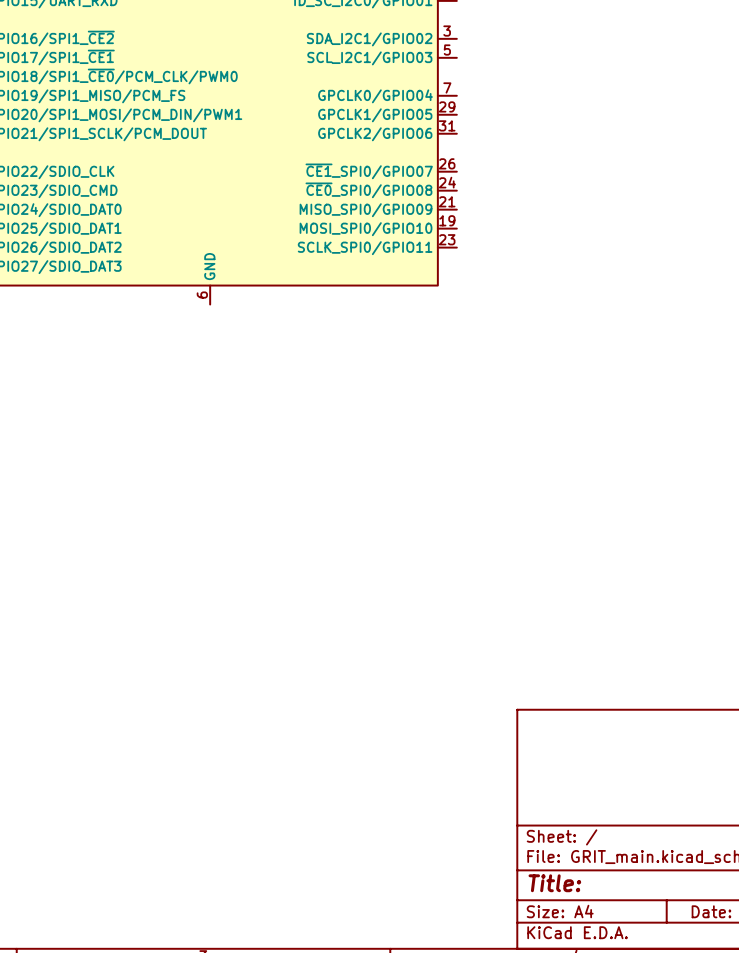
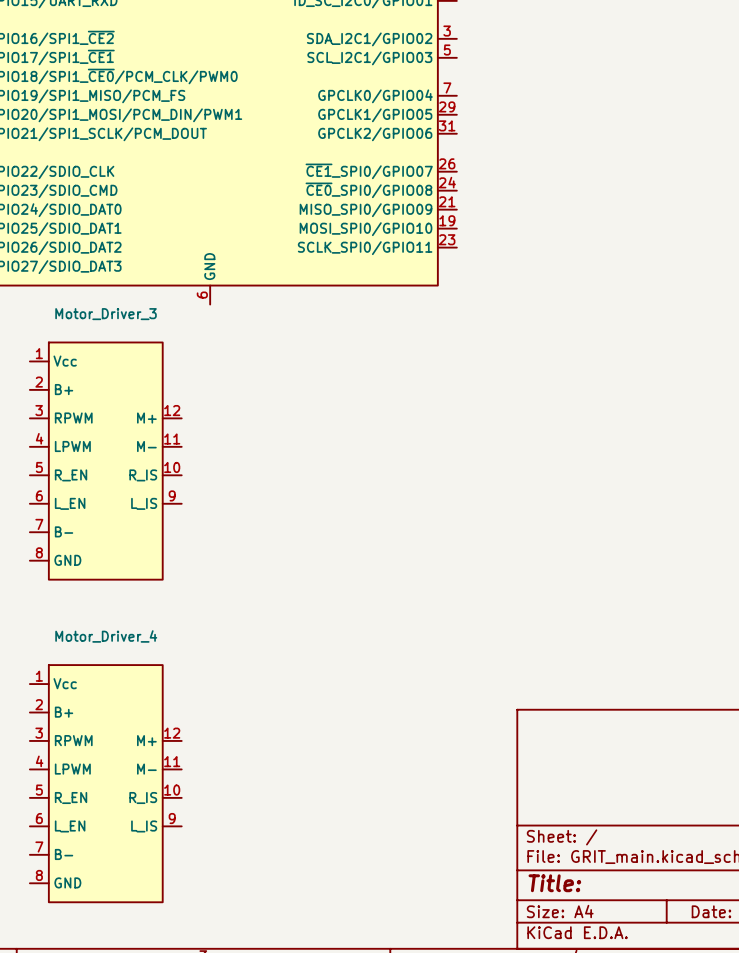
Motor_Driver_3: none -> (105, 461)
Motor_Driver_4: none -> (105, 783)

